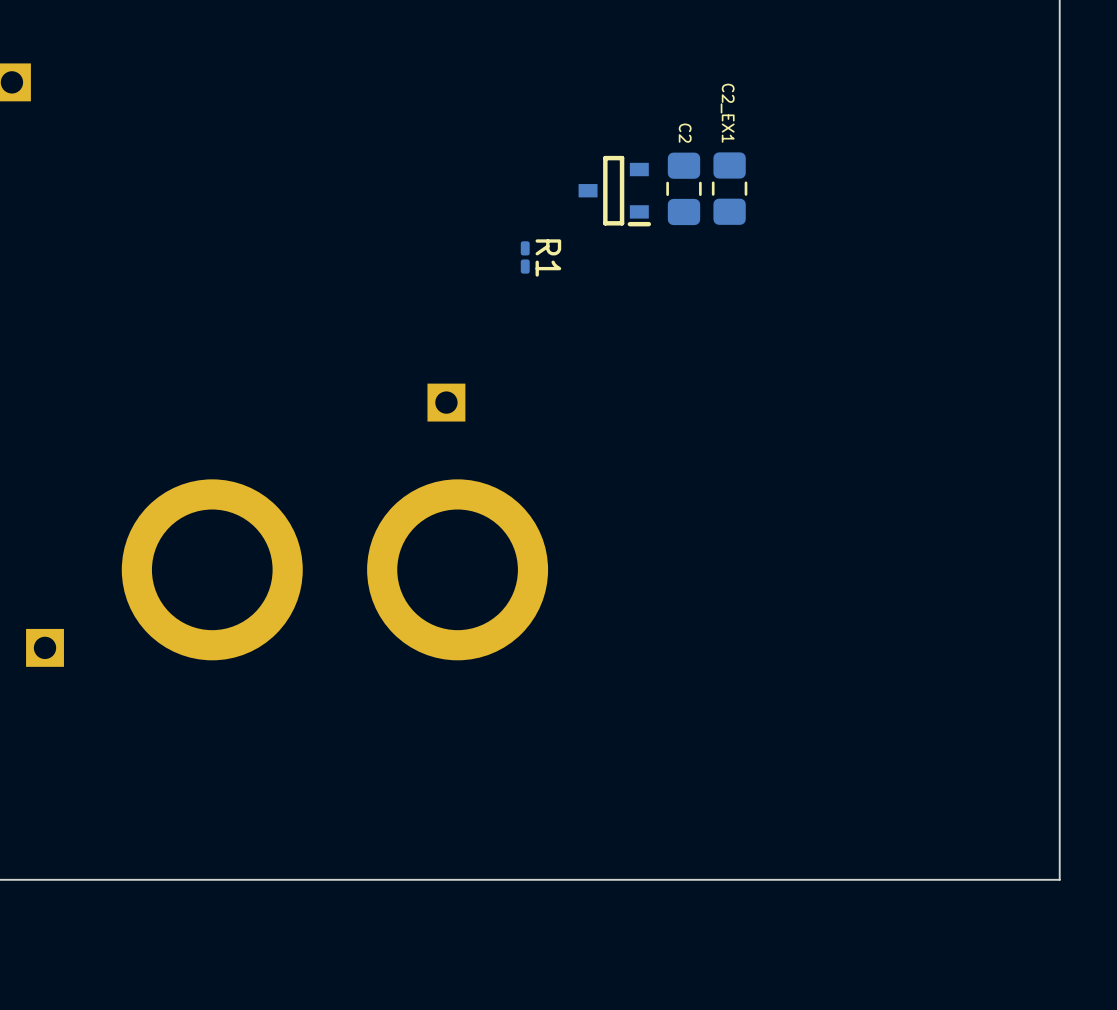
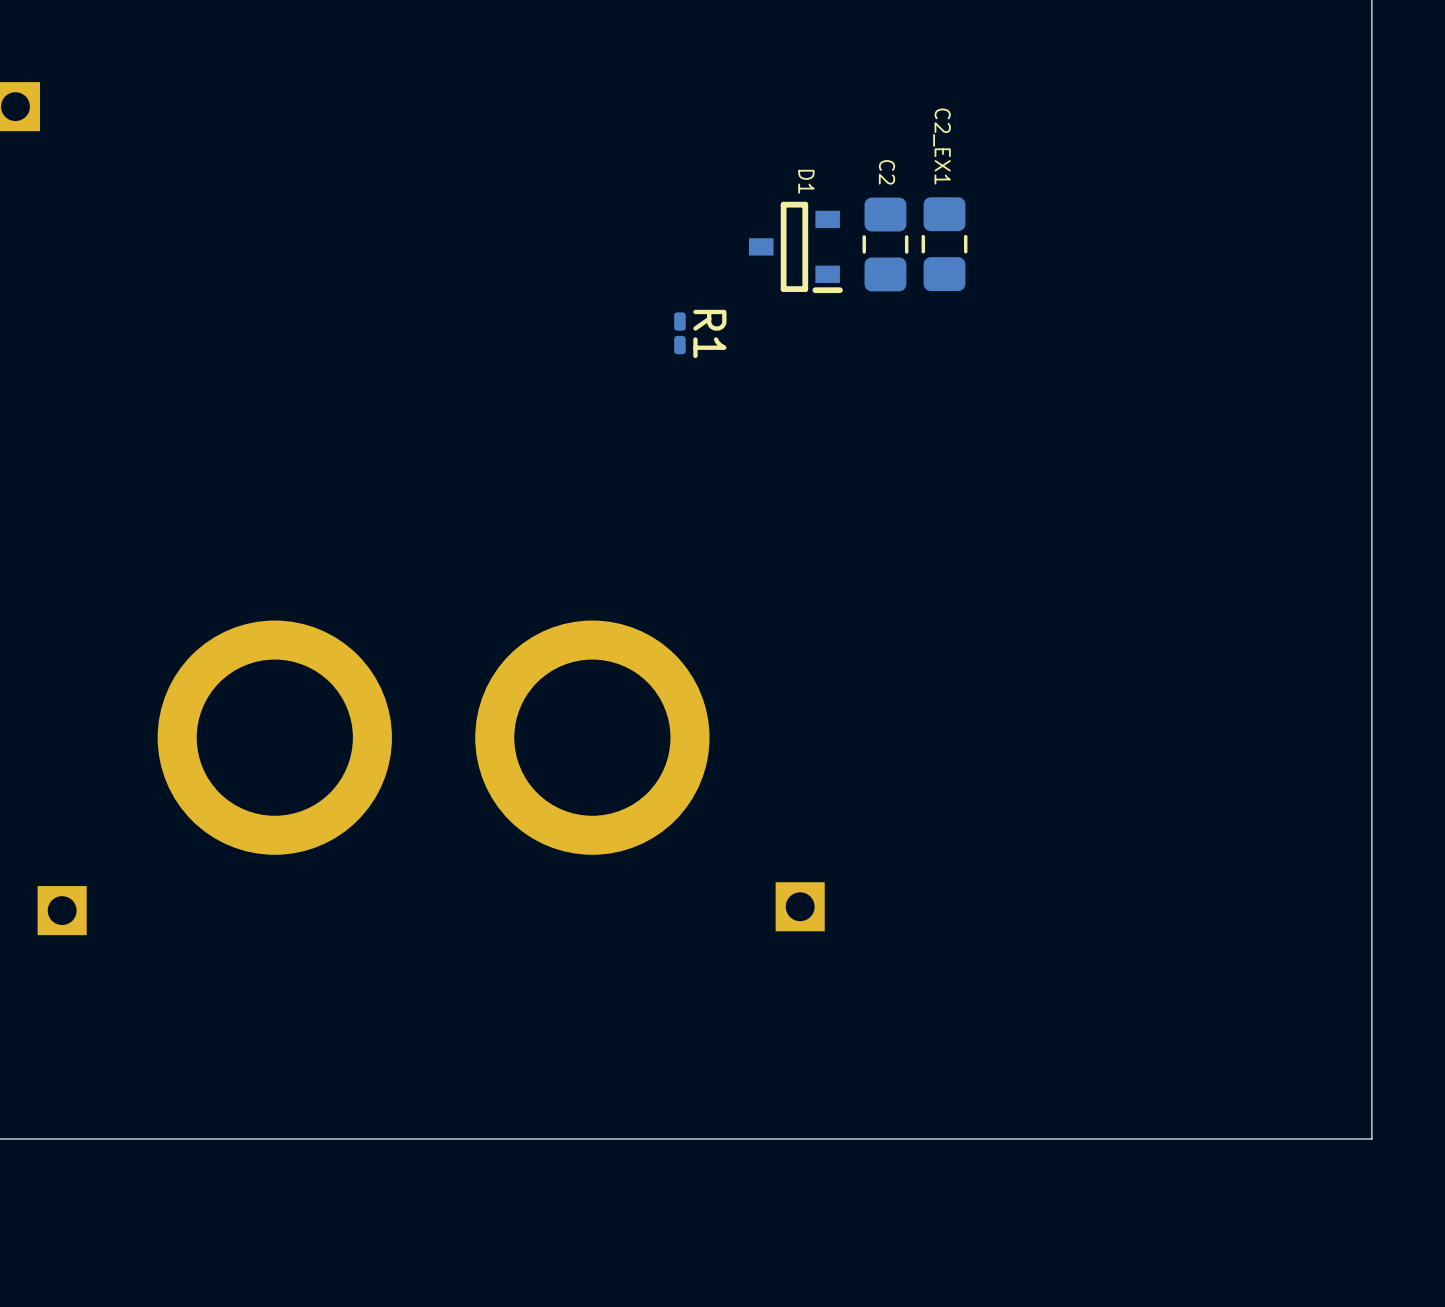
D1 name: none -> D1 (806, 181)
part: (446, 402) -> none
part position: (45, 647) -> (62, 910)
part: none -> (800, 906)

